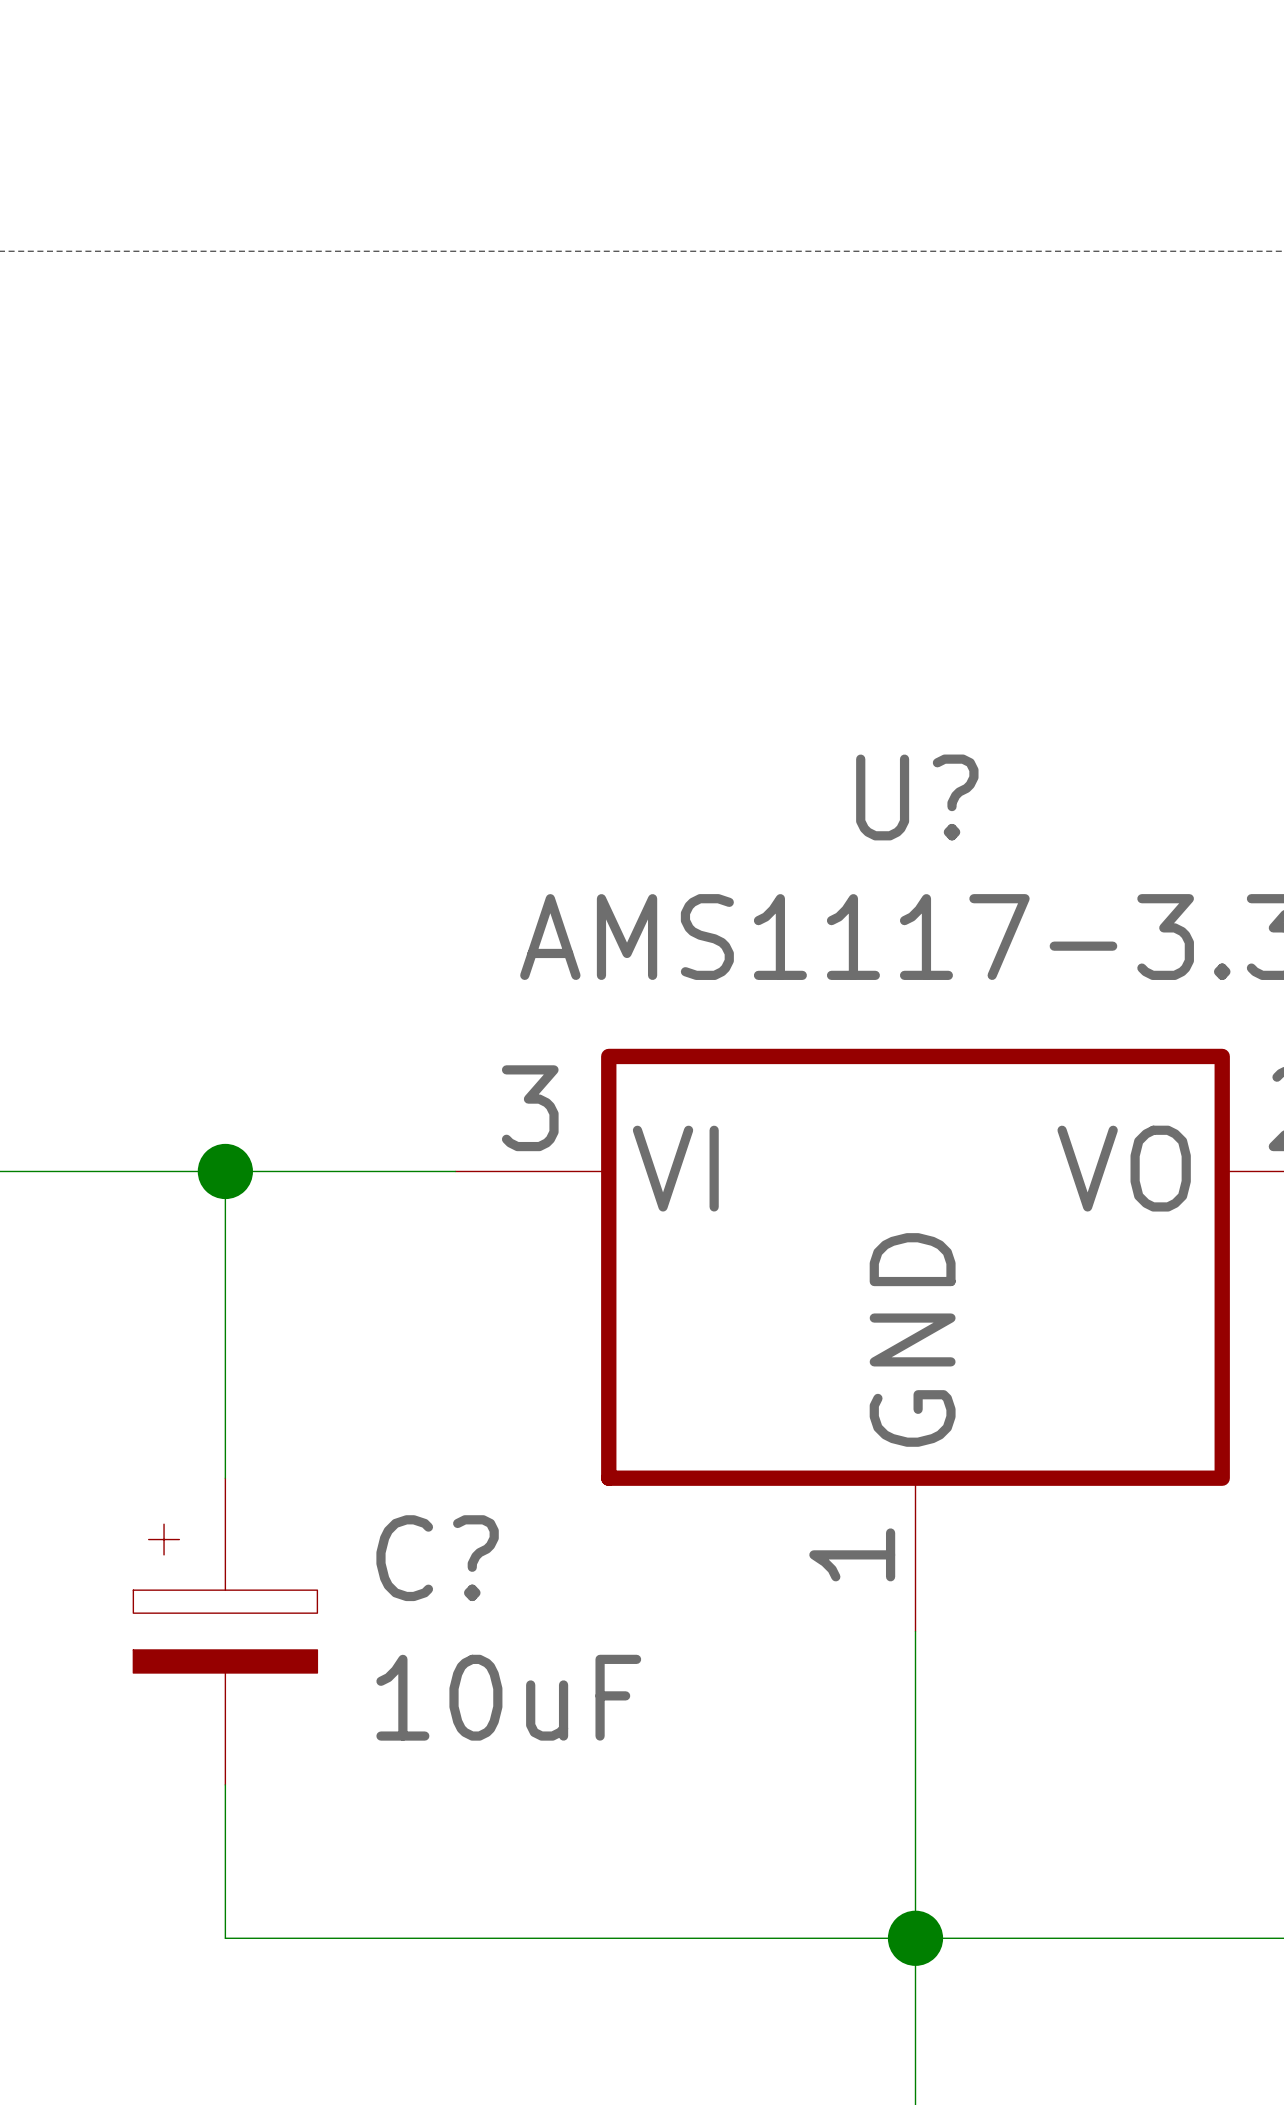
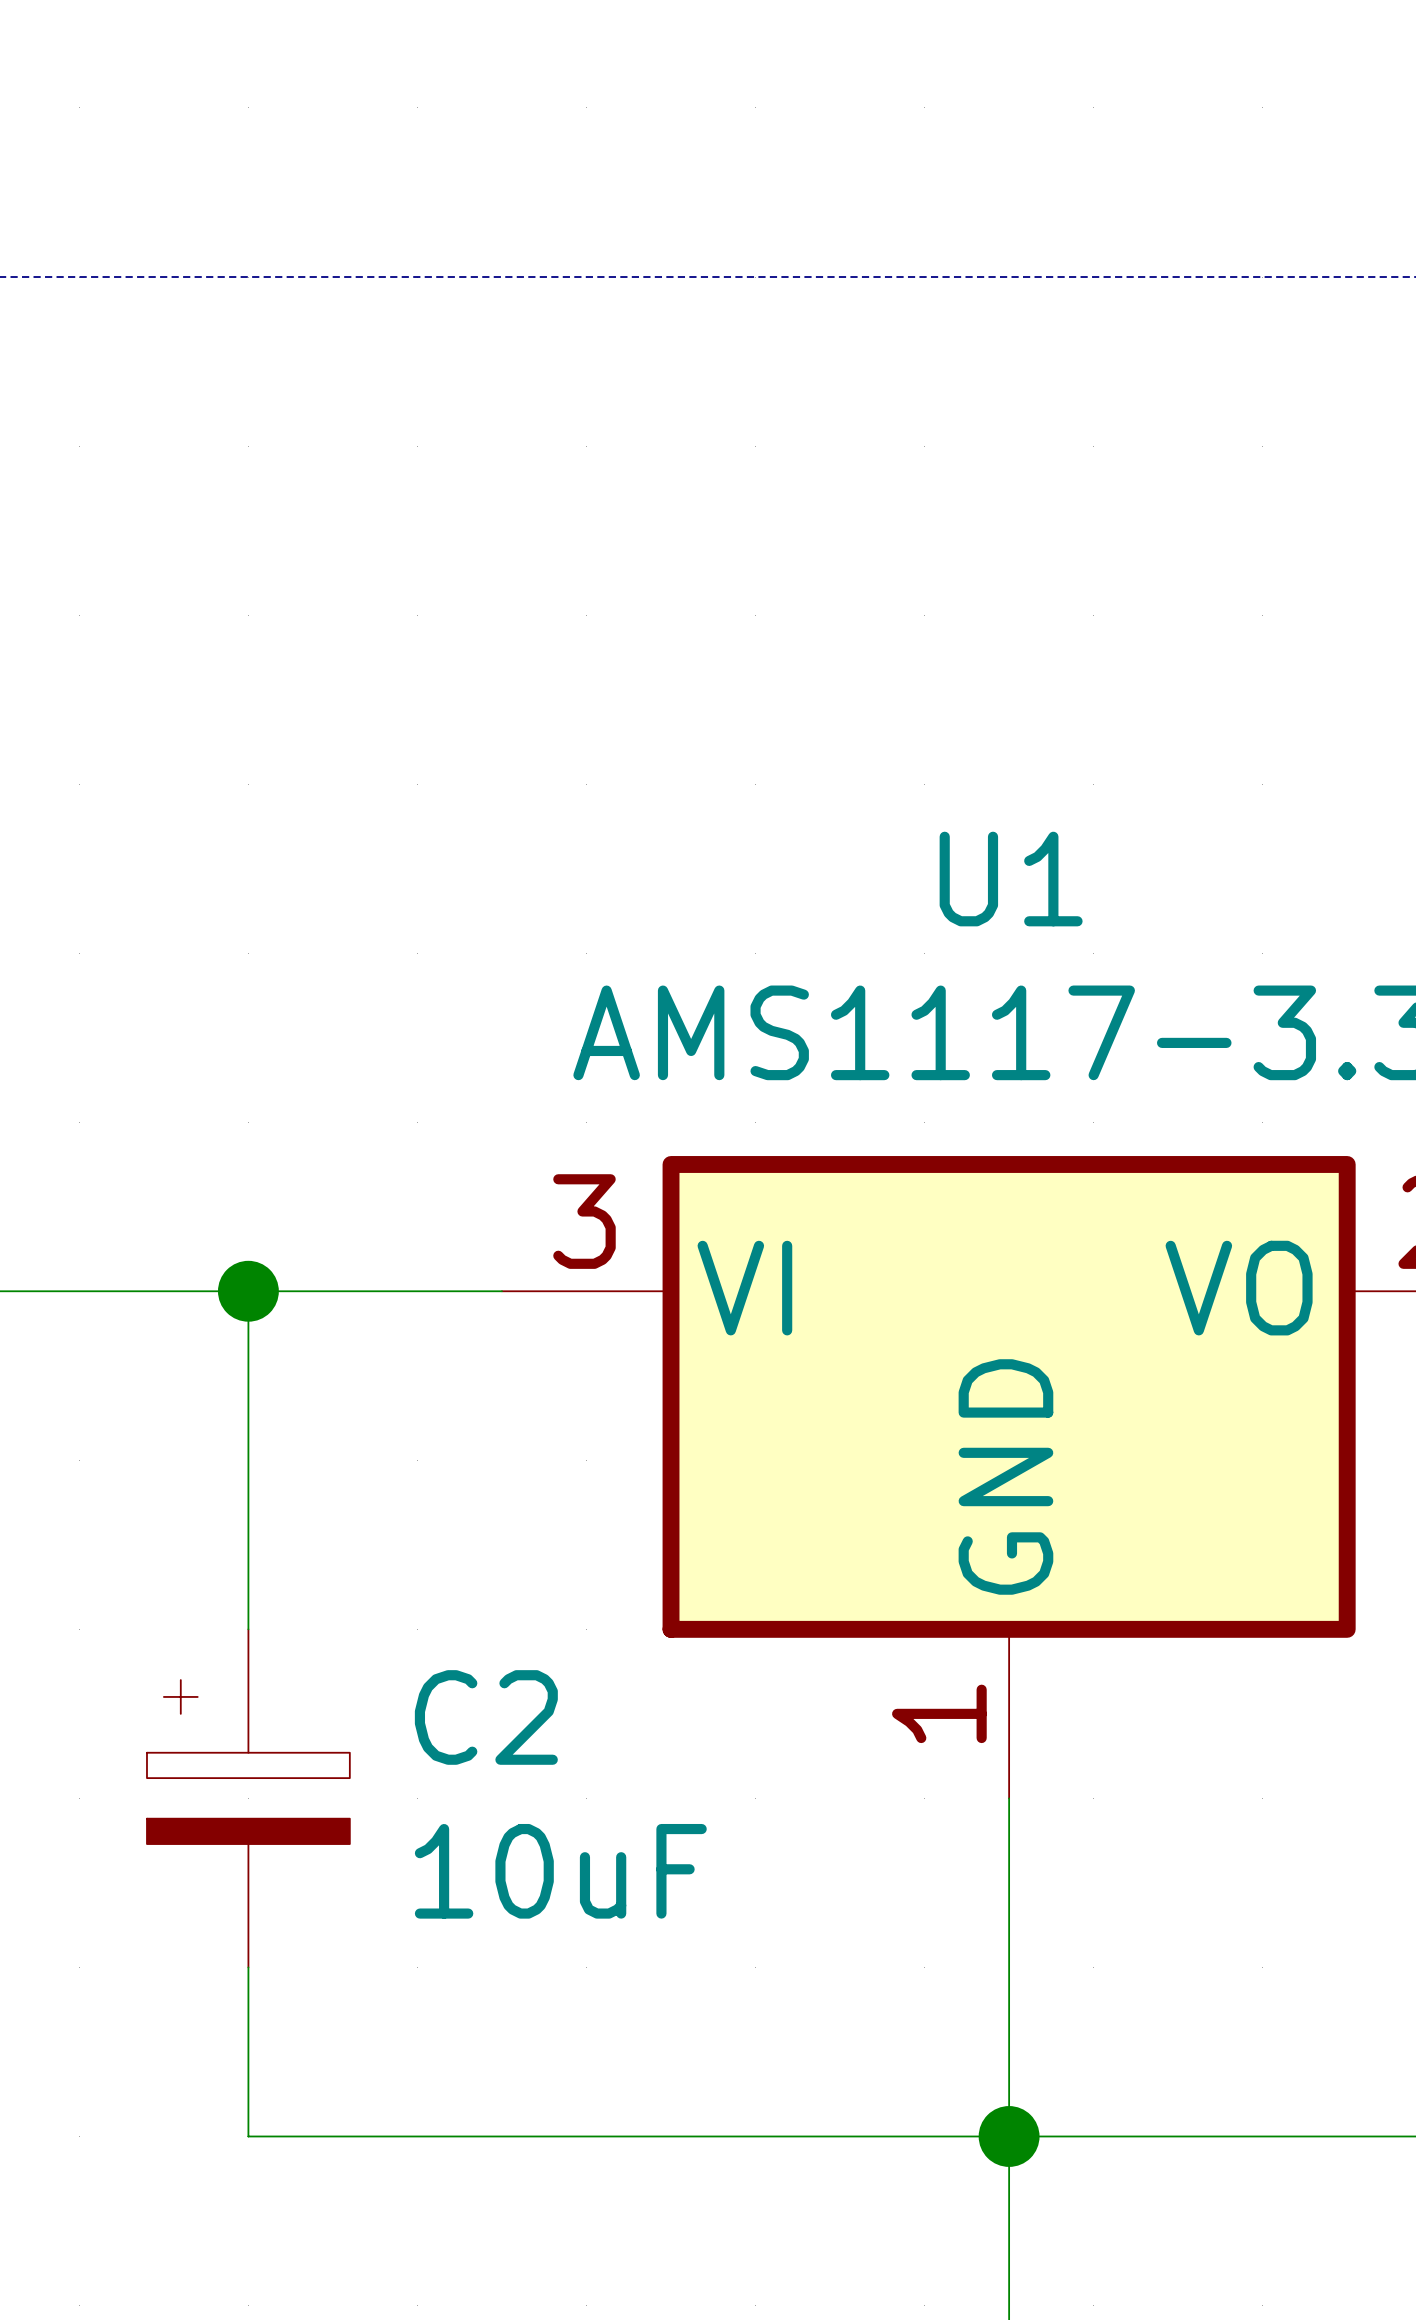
U? name: U? (917, 797) -> U1 (1011, 879)
C? name: C? (437, 1558) -> C2 (486, 1717)

